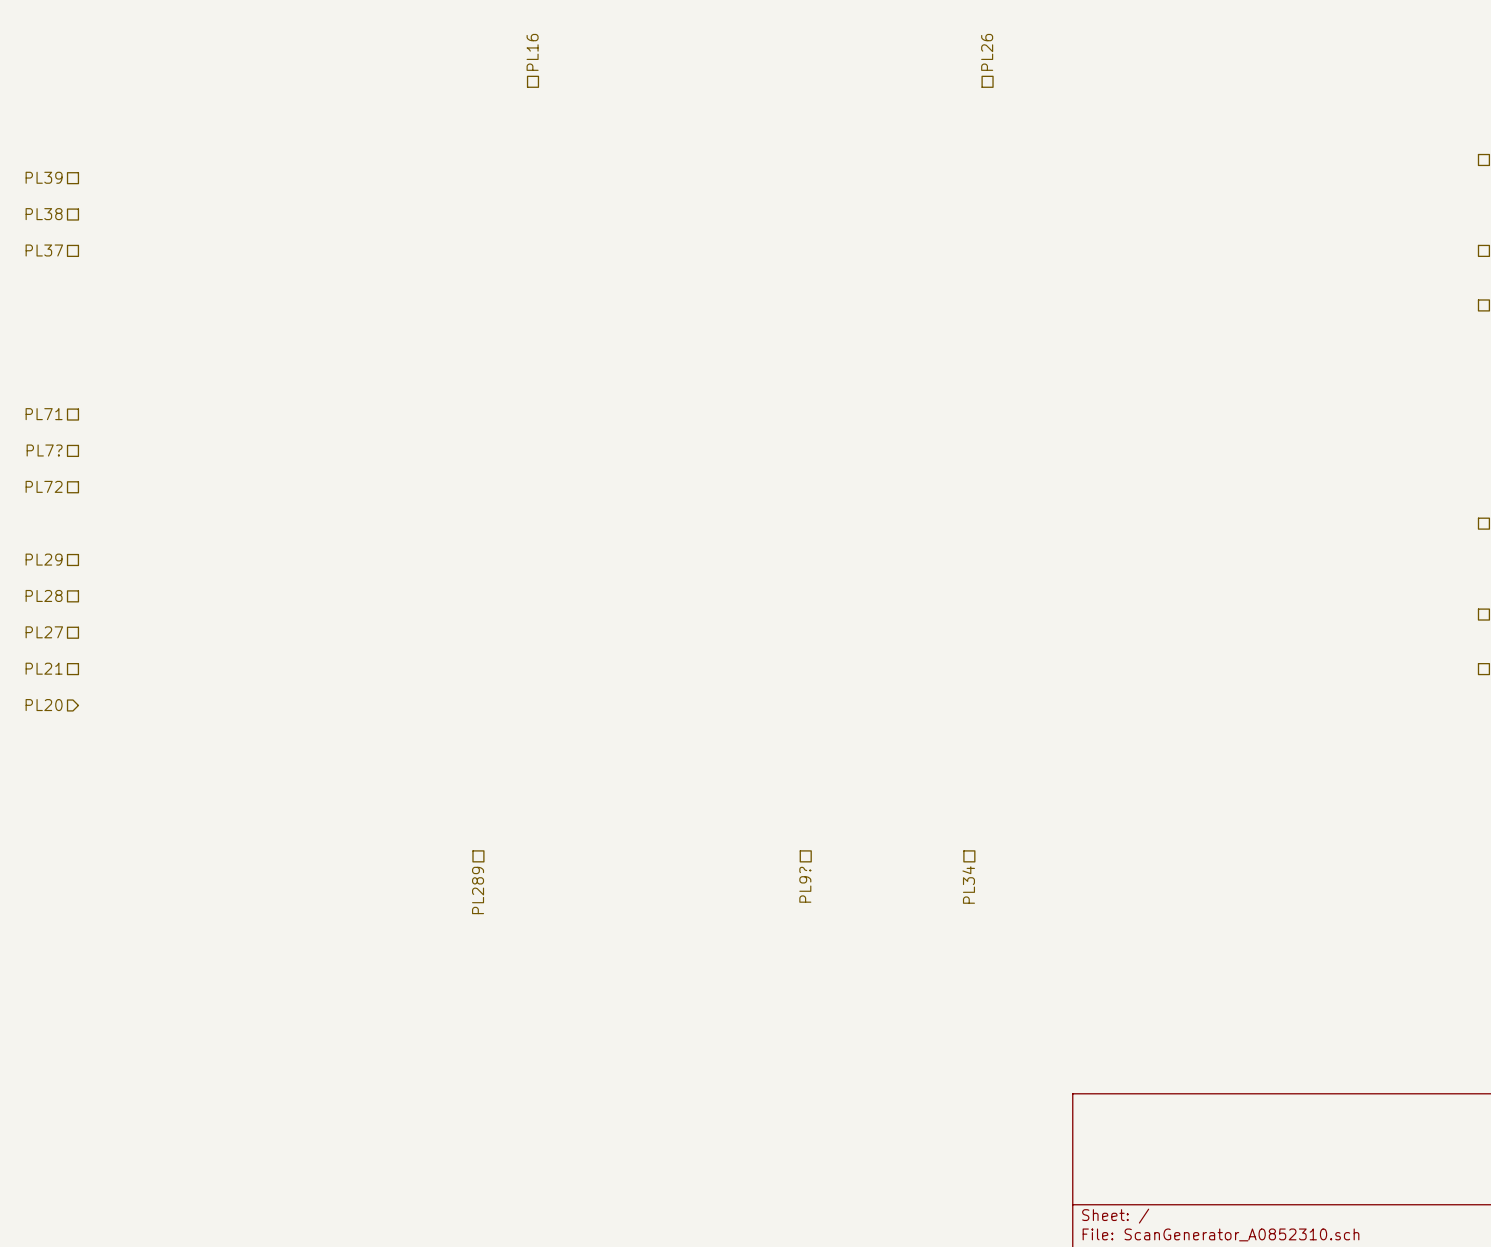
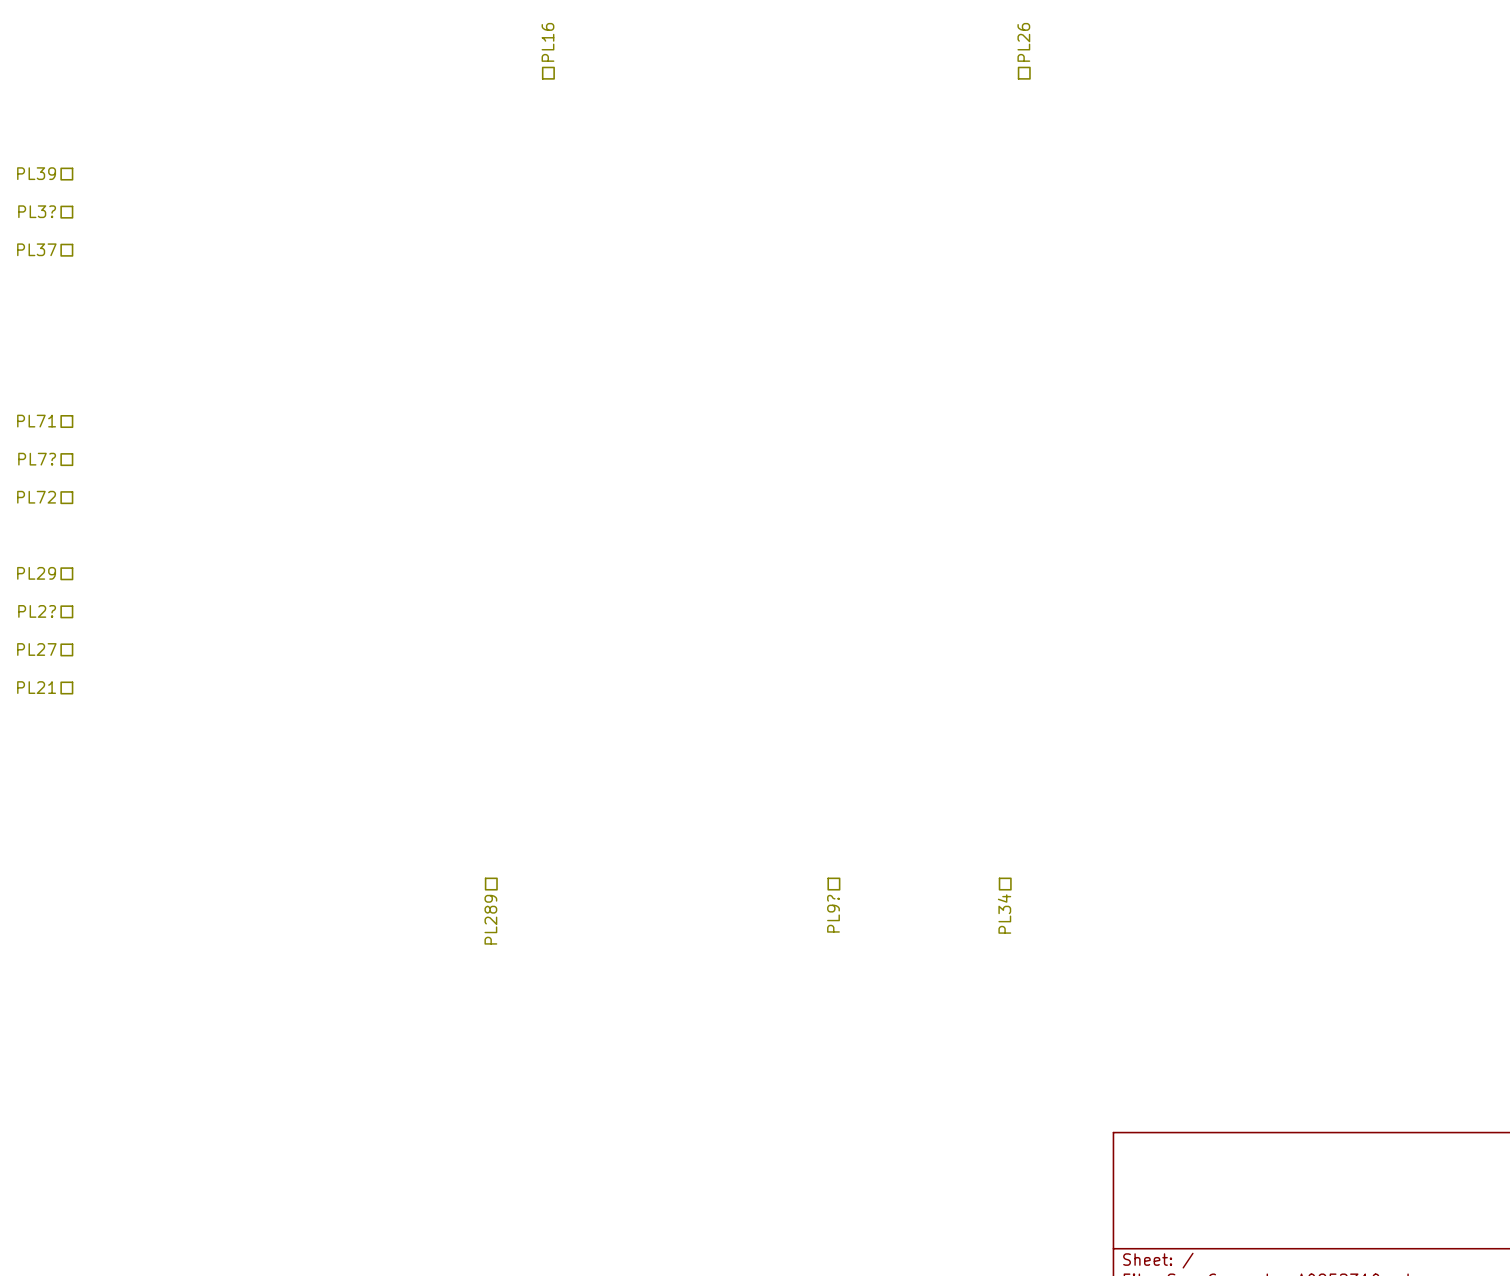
hierarchical label: PL38 (44, 214) -> PL3? (37, 211)
hierarchical label: PL28 (44, 595) -> PL2? (37, 611)
hierarchical label: PL20 (44, 705) -> none

